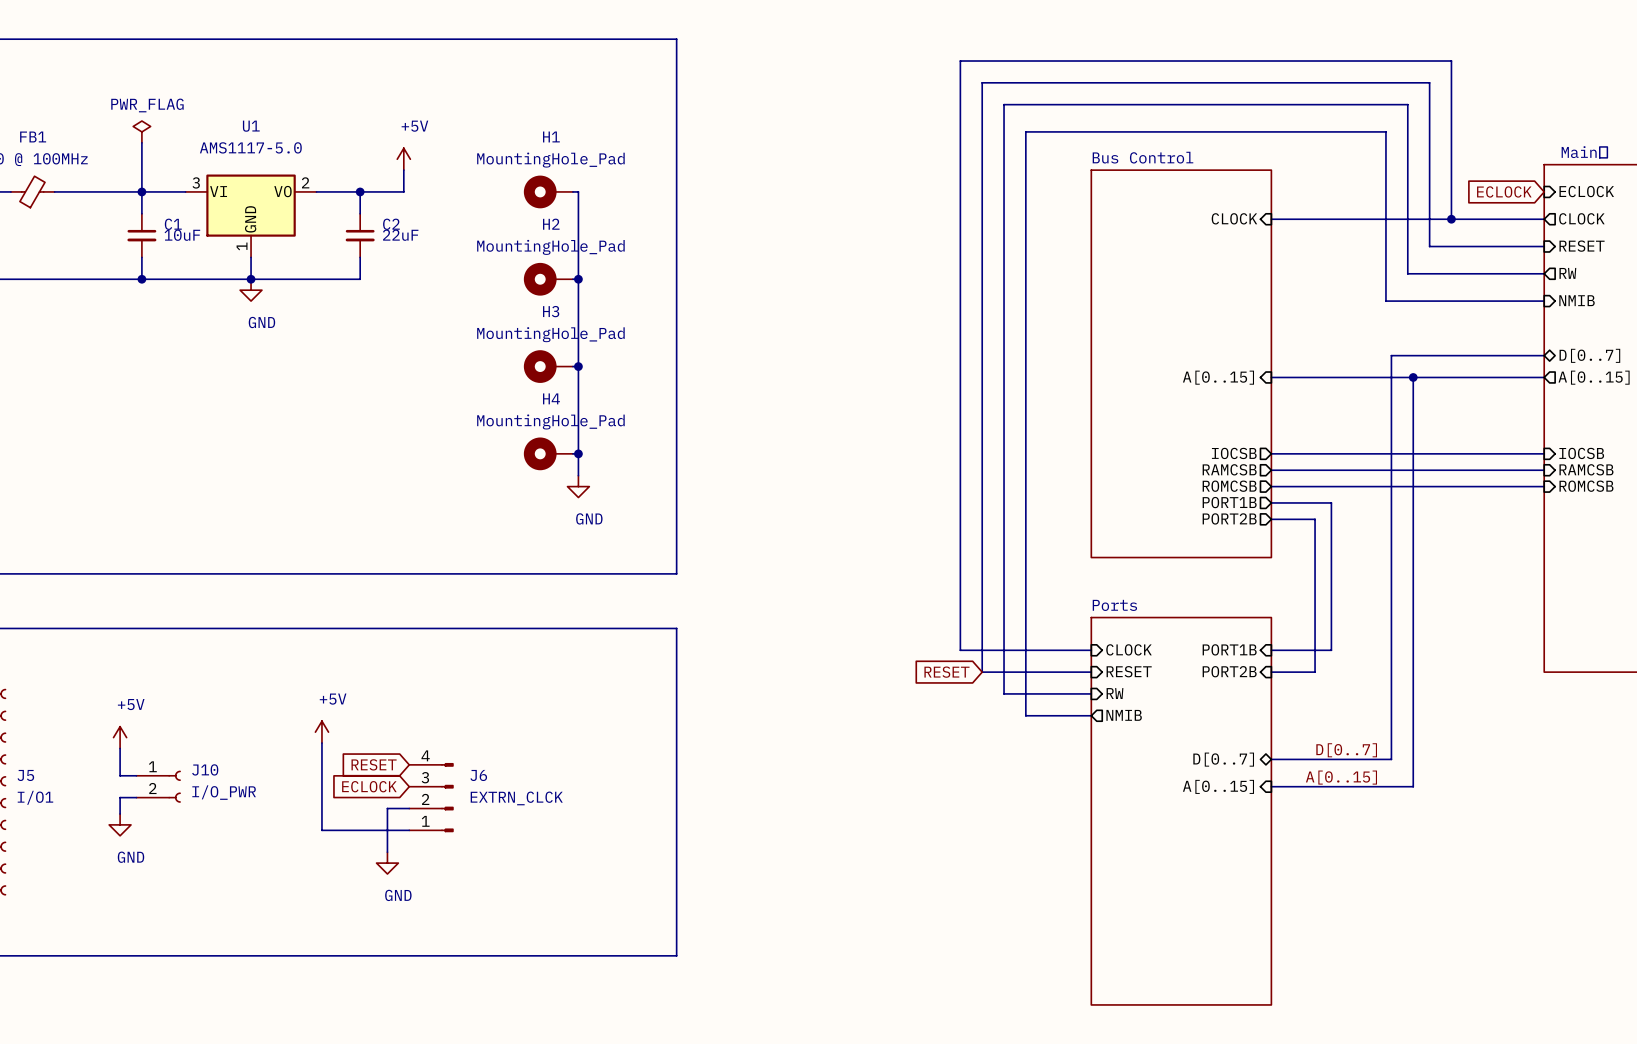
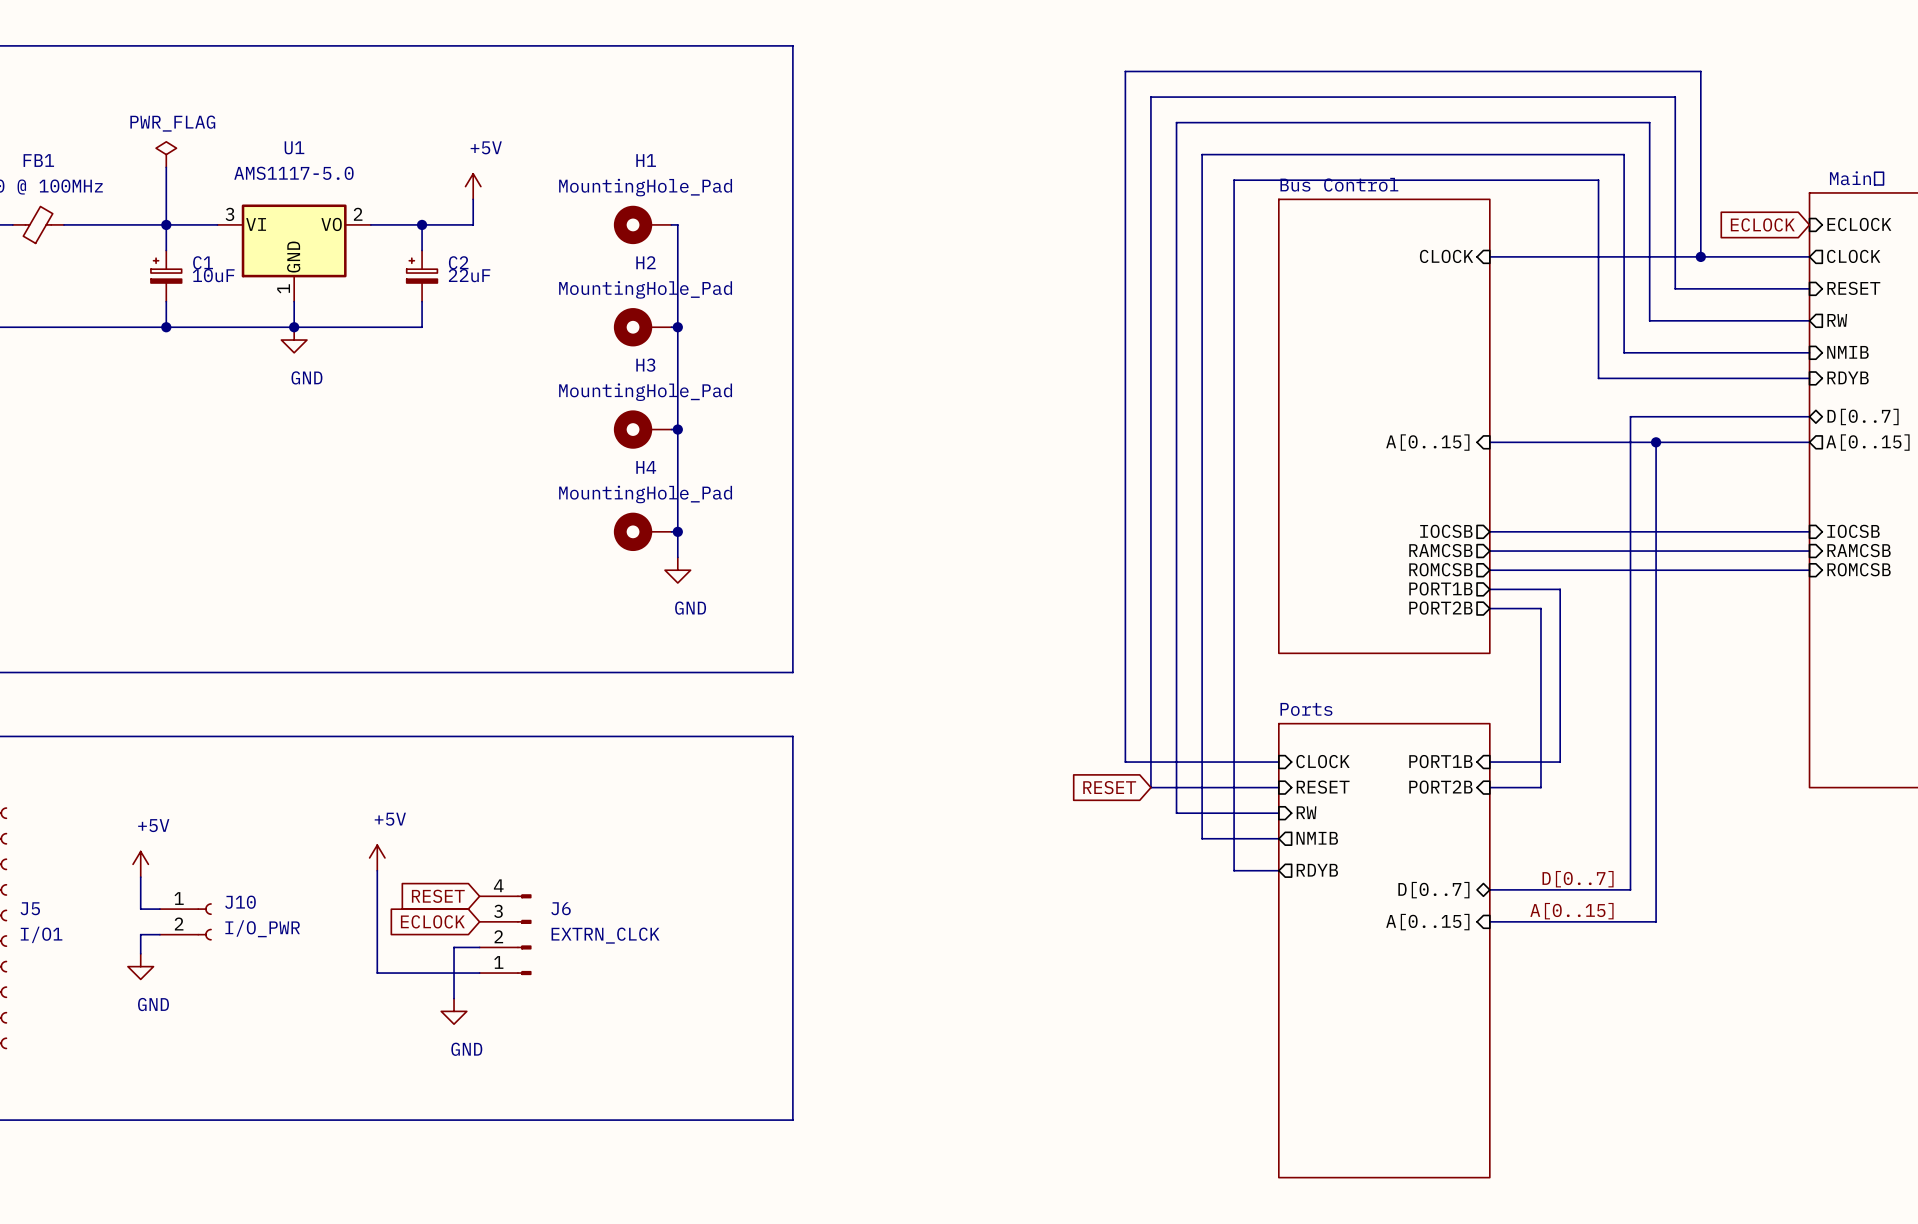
C1 symbol: [127, 213, 157, 258] -> [150, 250, 182, 302]
C2 symbol: [345, 213, 375, 258] -> [406, 250, 438, 302]
wire: none -> (1809, 378) (1598, 378) (1598, 180) (1234, 180) (1234, 870) (1278, 870)
sheet pin: none -> RDYB (1848, 377)
sheet pin: none -> RDYB (1317, 870)

